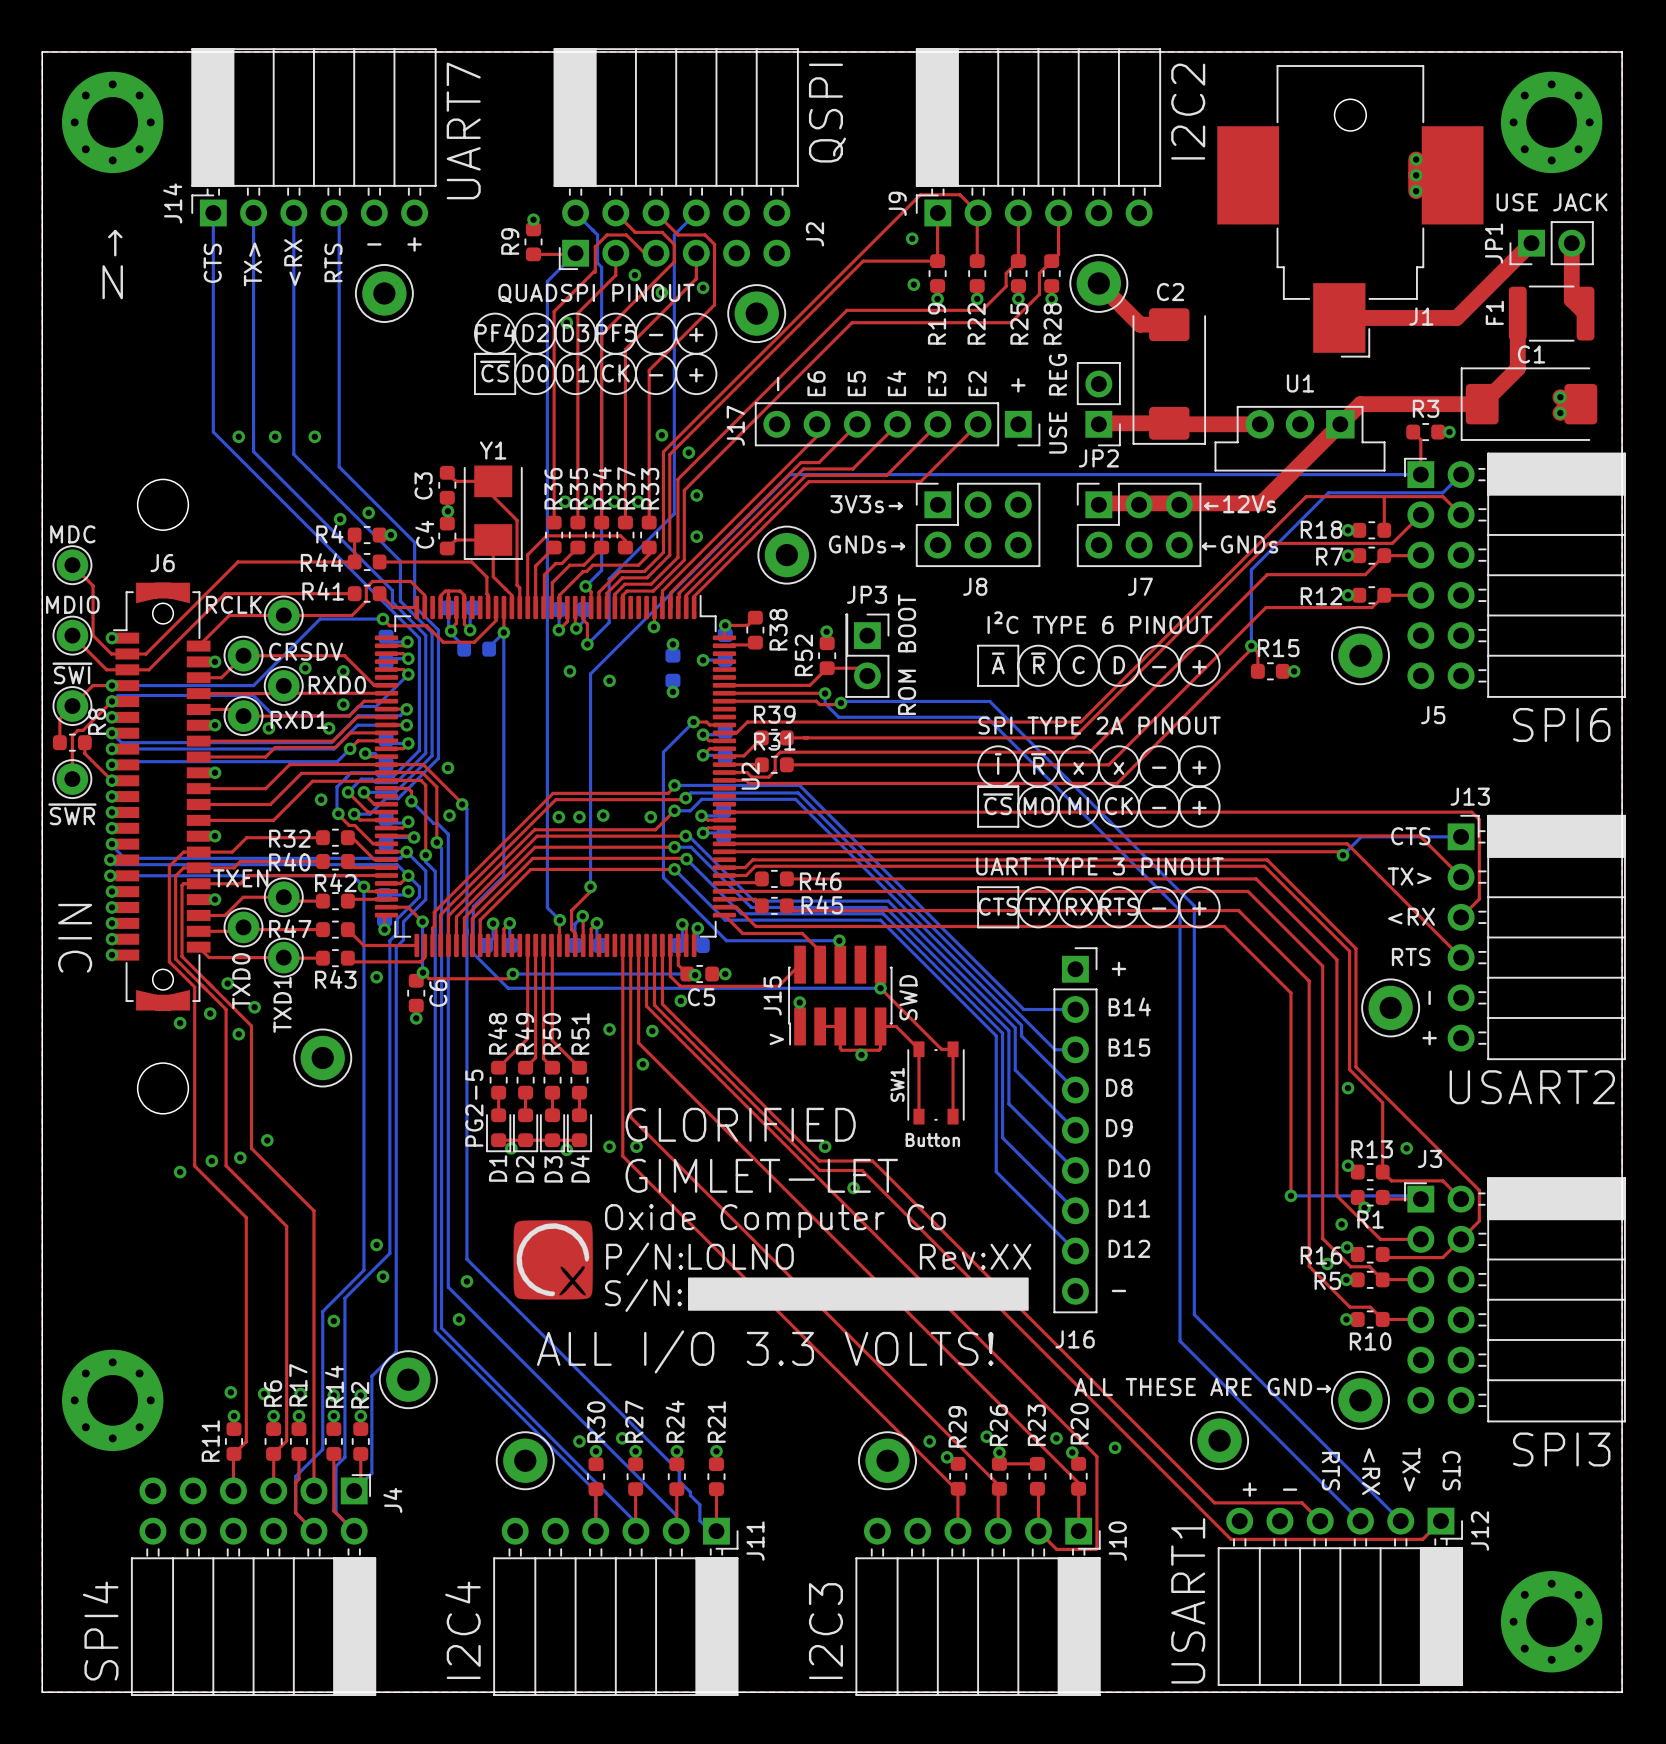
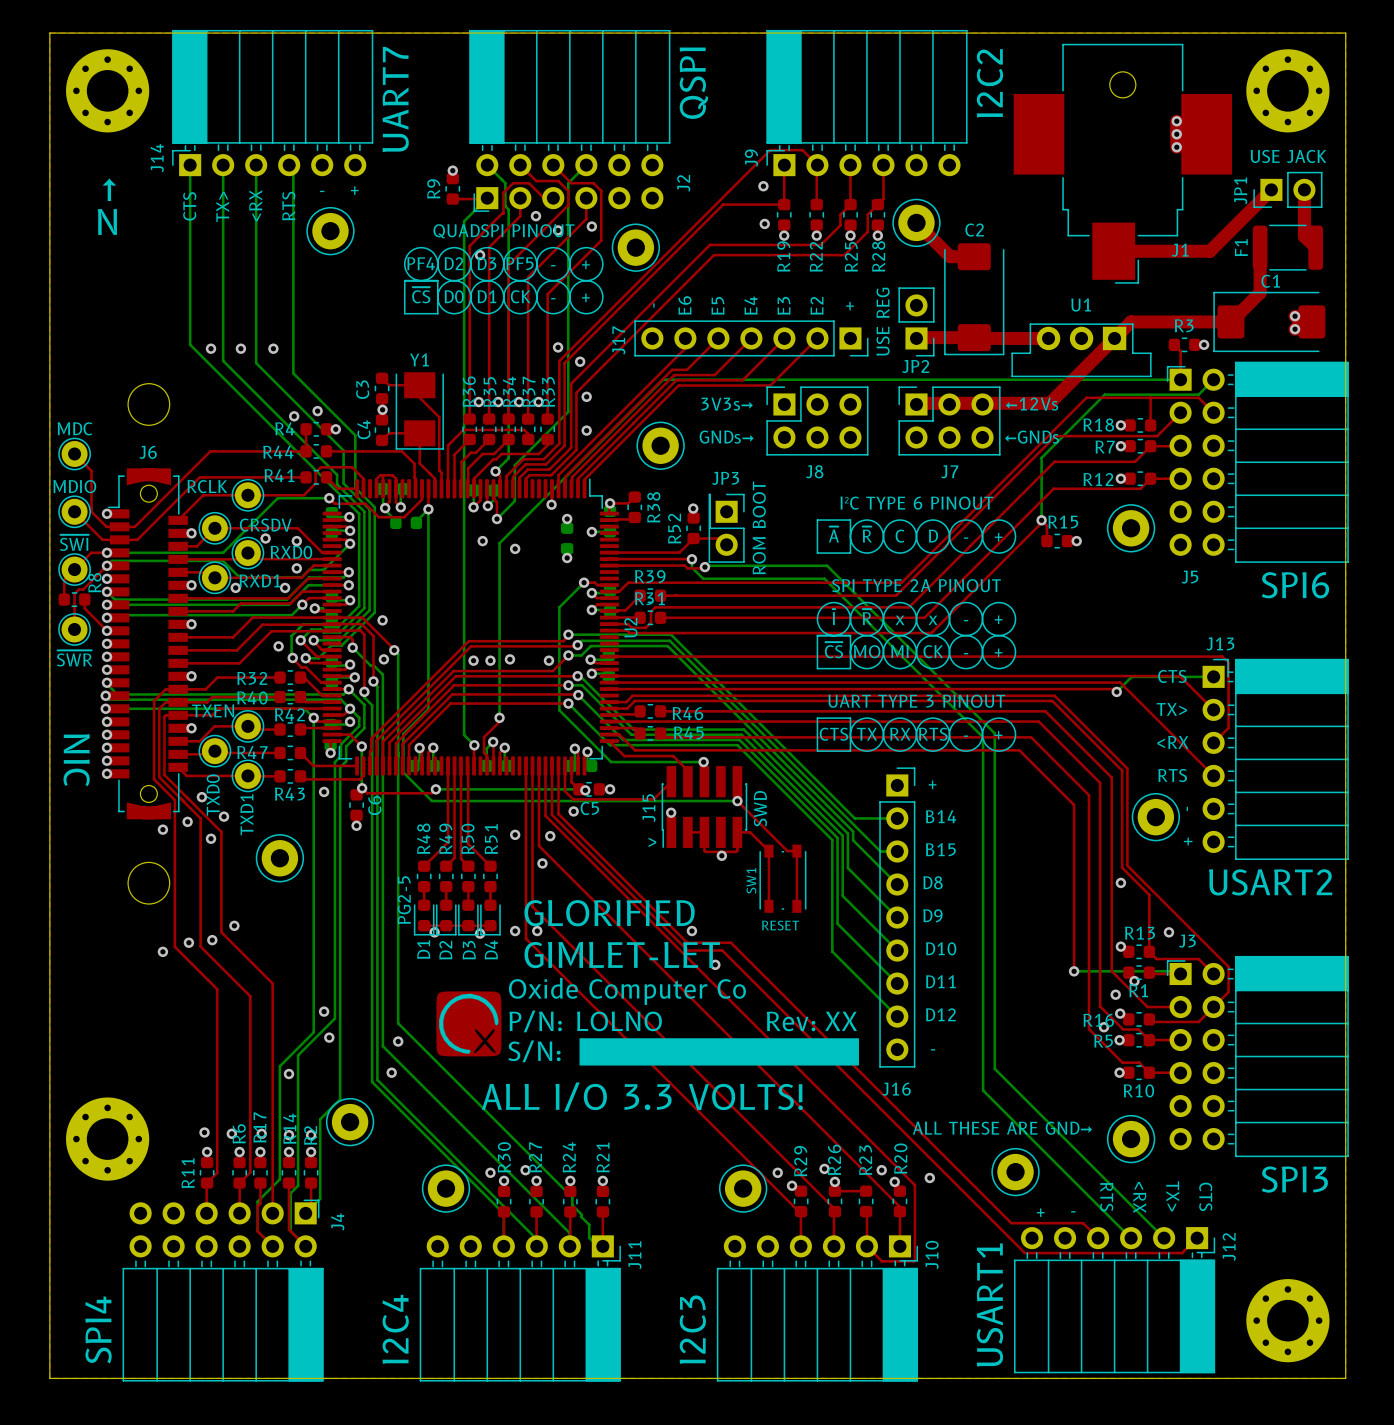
SW1 value: Button (932, 1139) -> RESET (780, 925)

